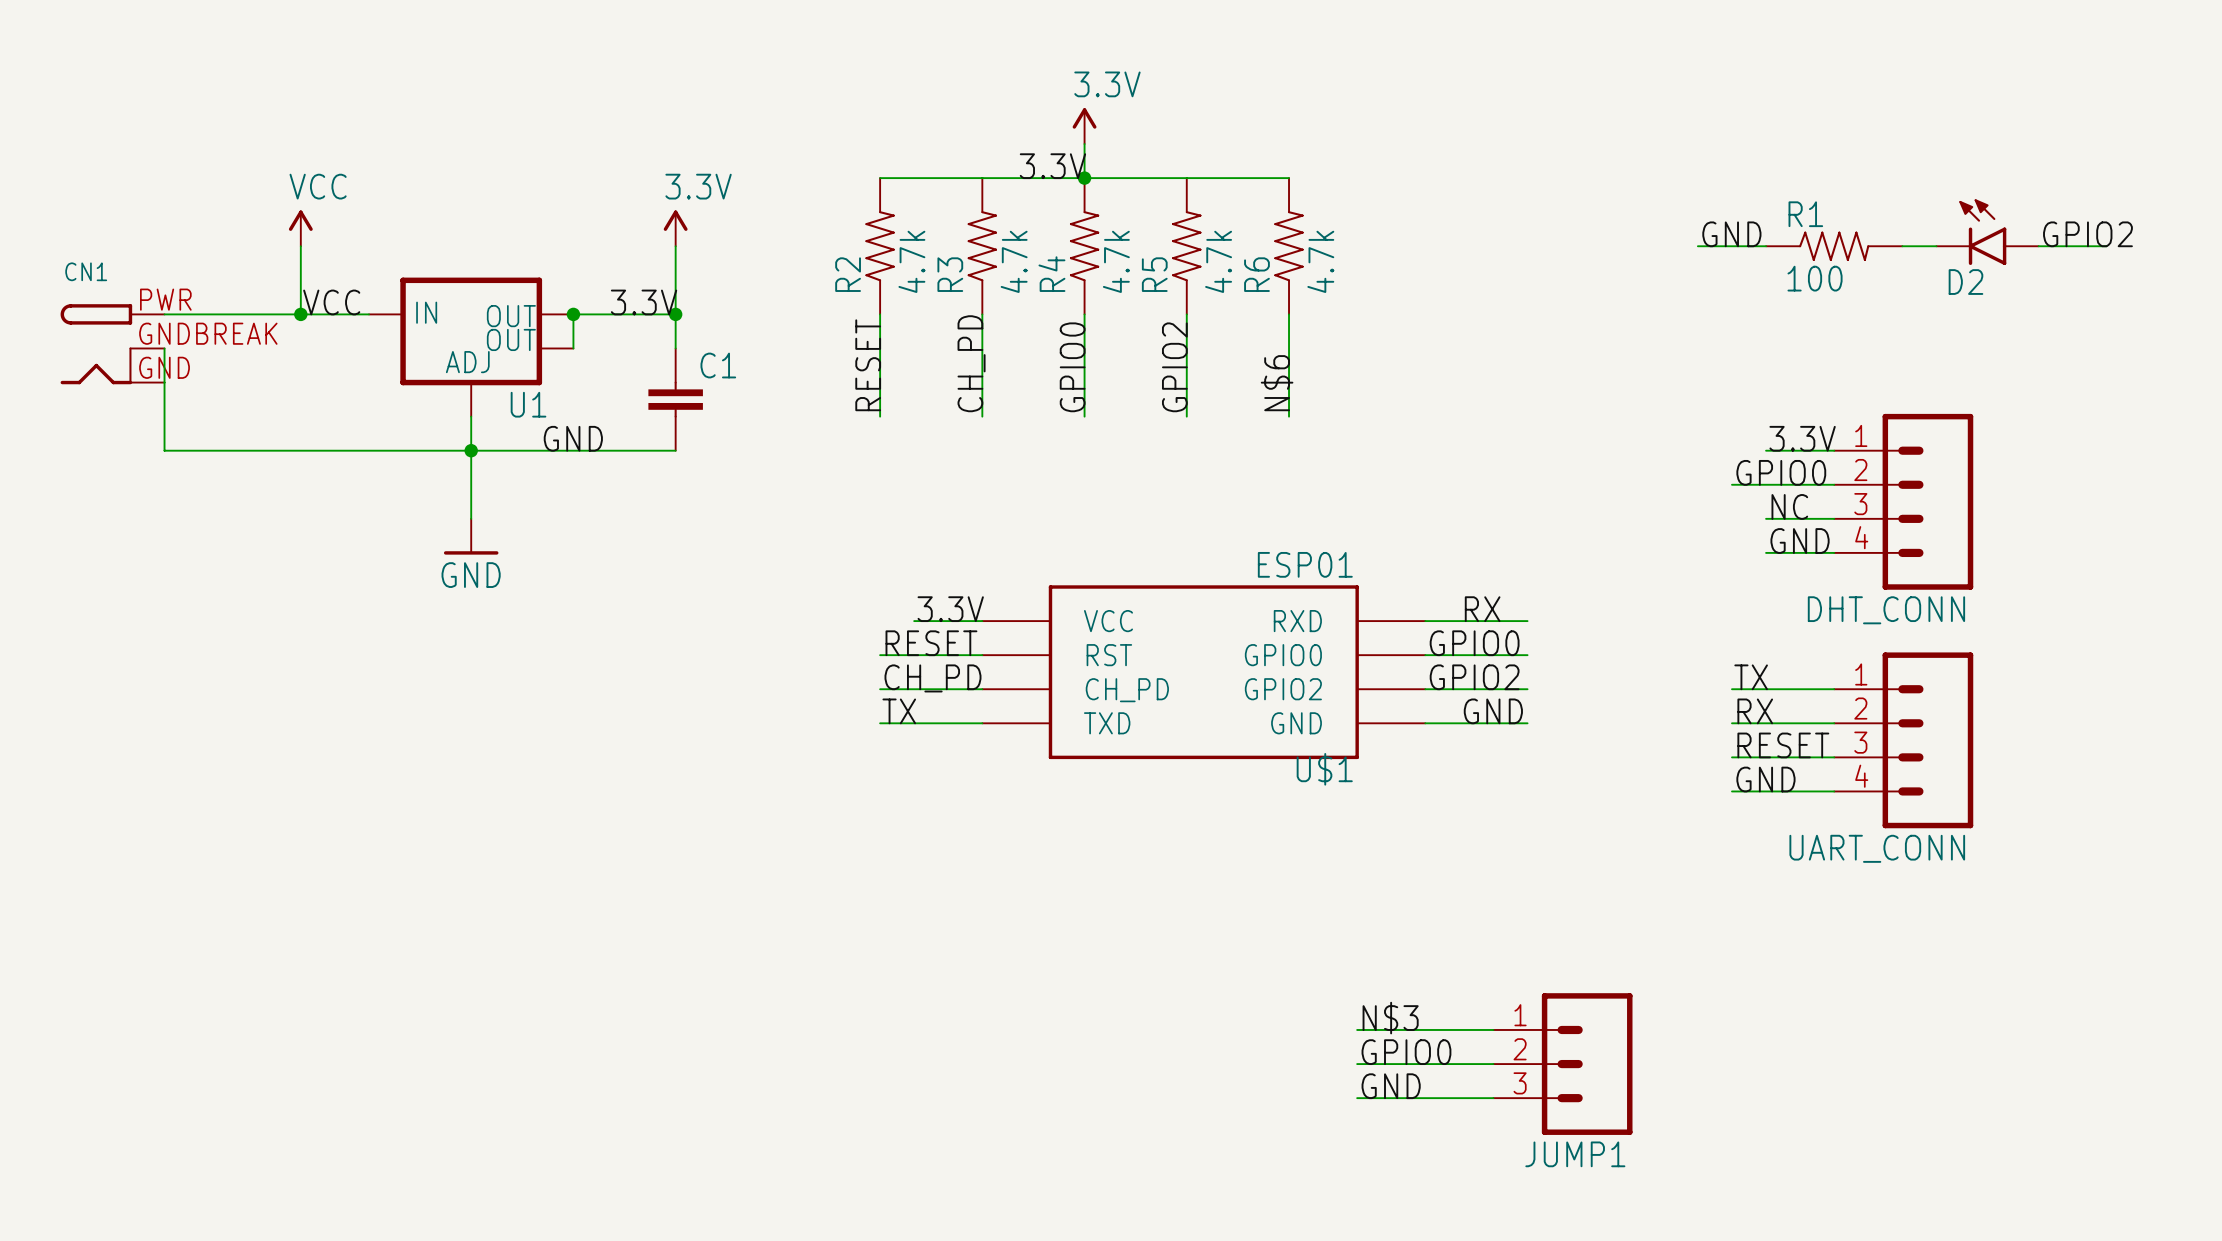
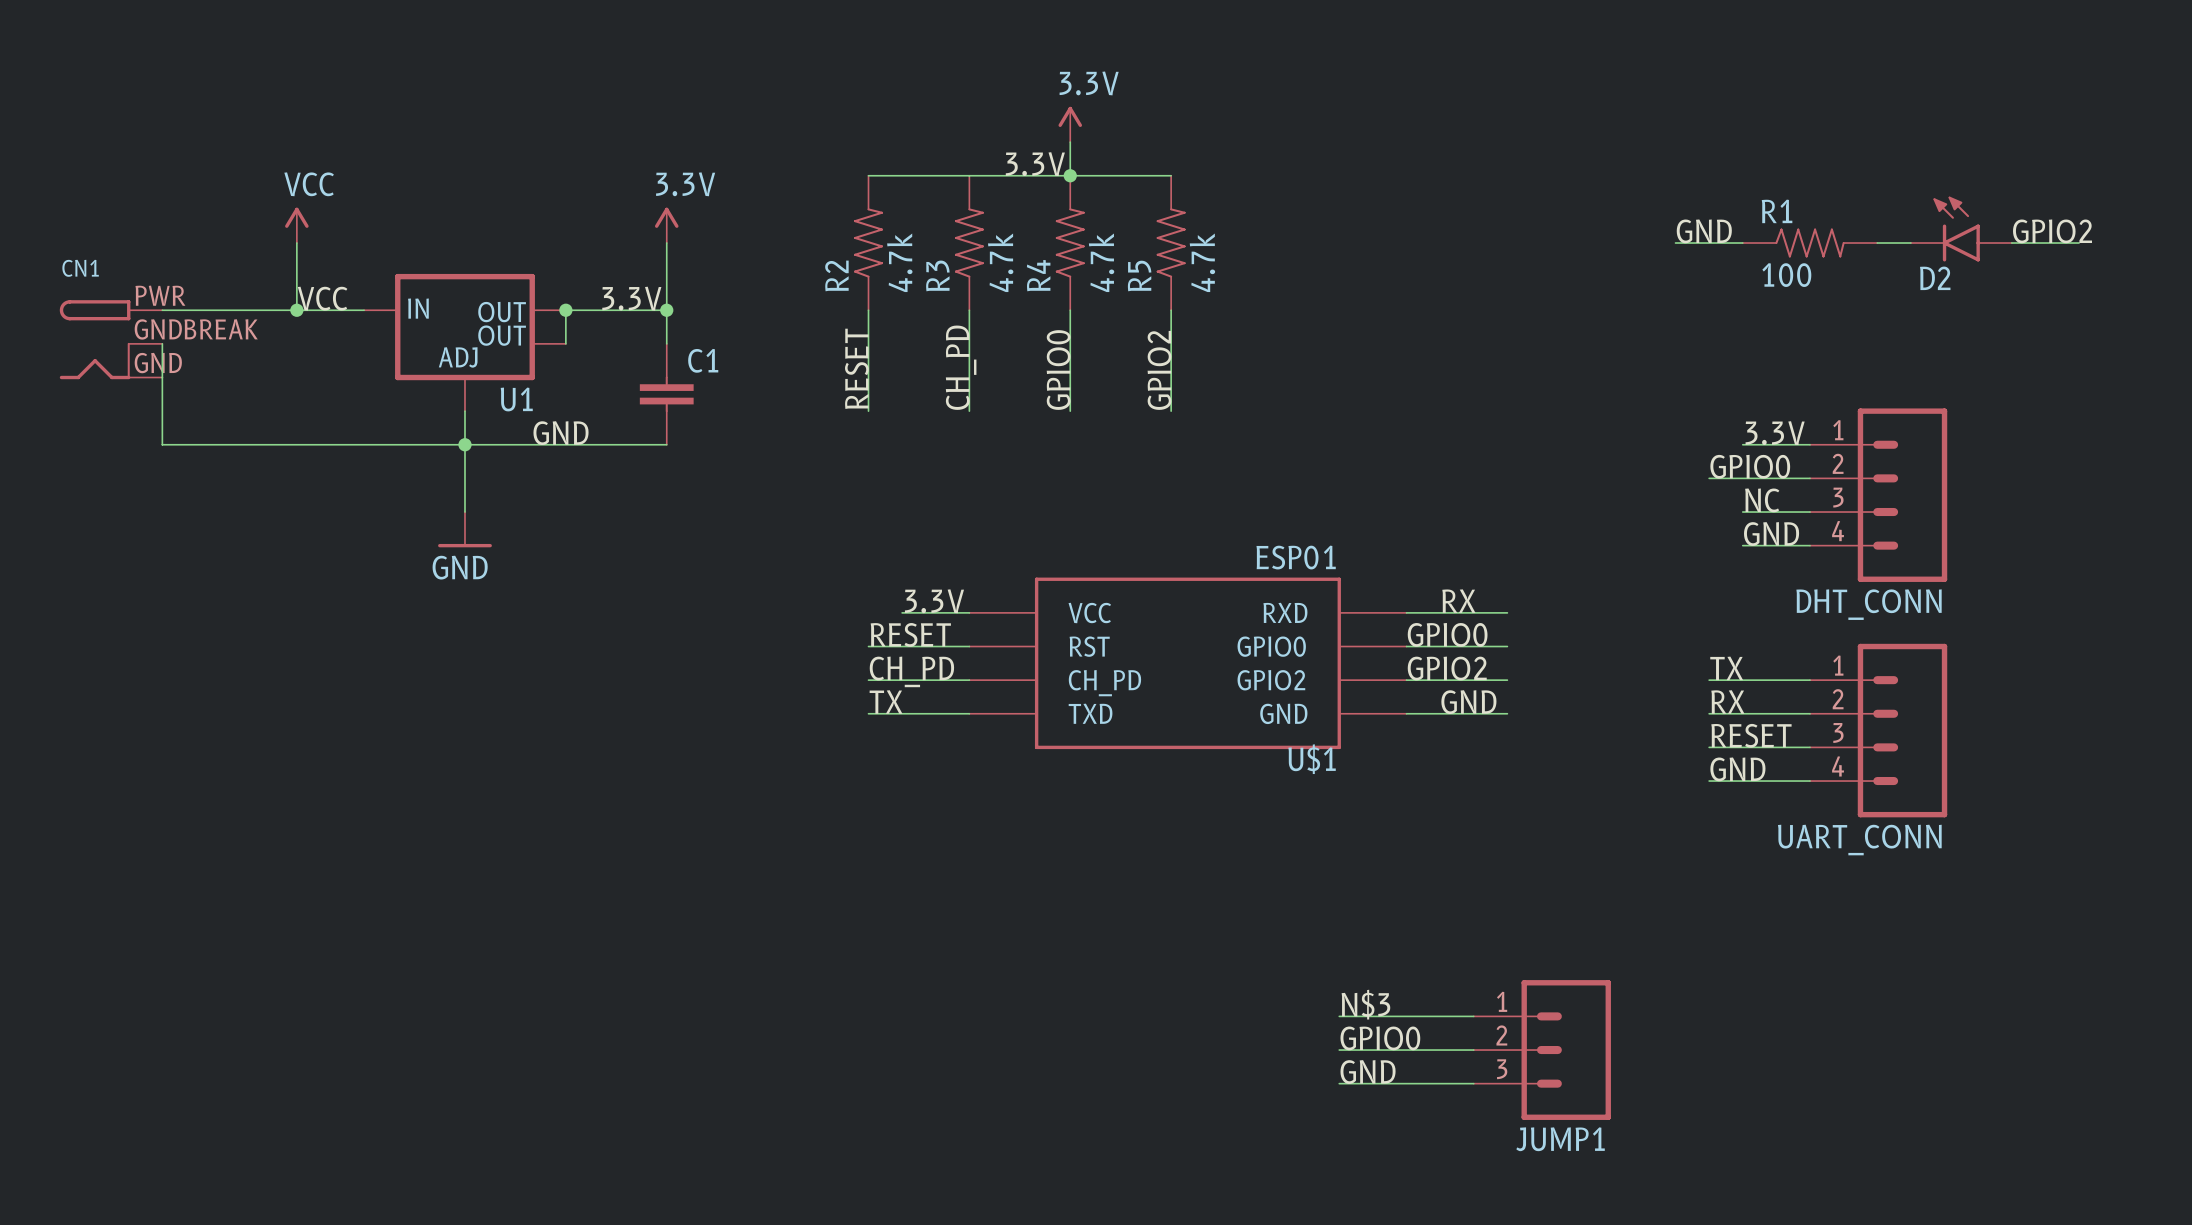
wire: (1186, 178) (1289, 178) -> none
R6: 4.7k (1289, 246) -> none
wire: (1289, 314) (1289, 416) -> none
label: N$6 (1277, 383) -> none

